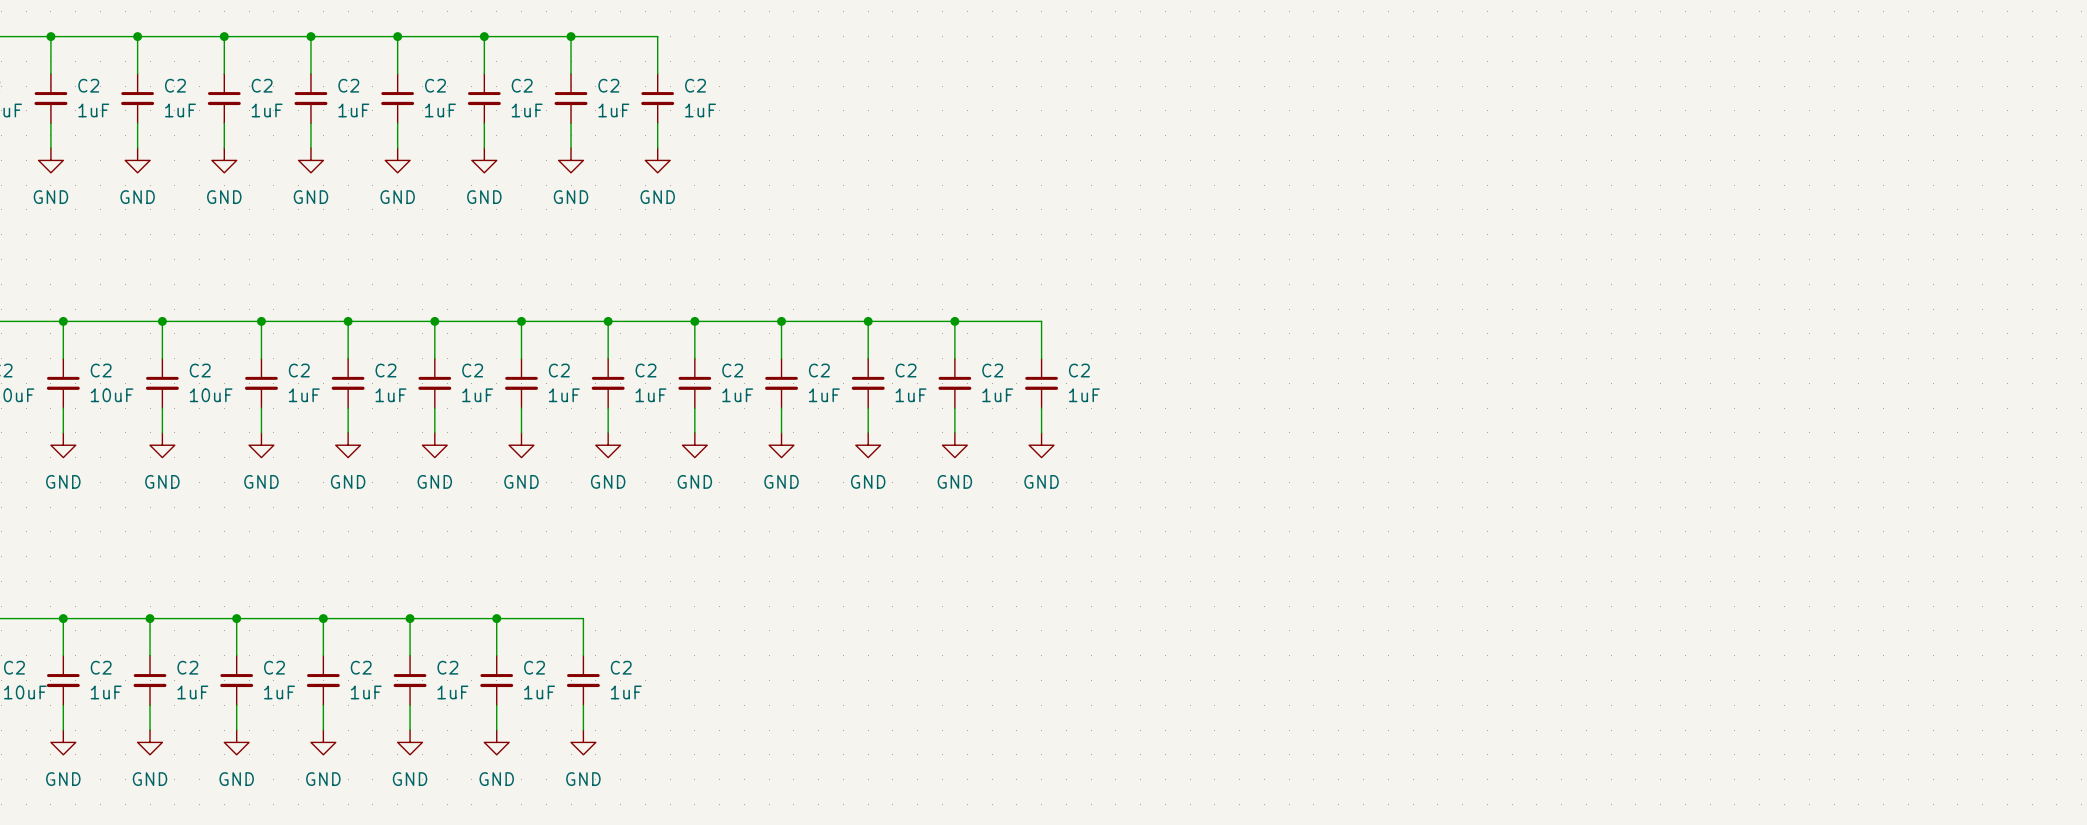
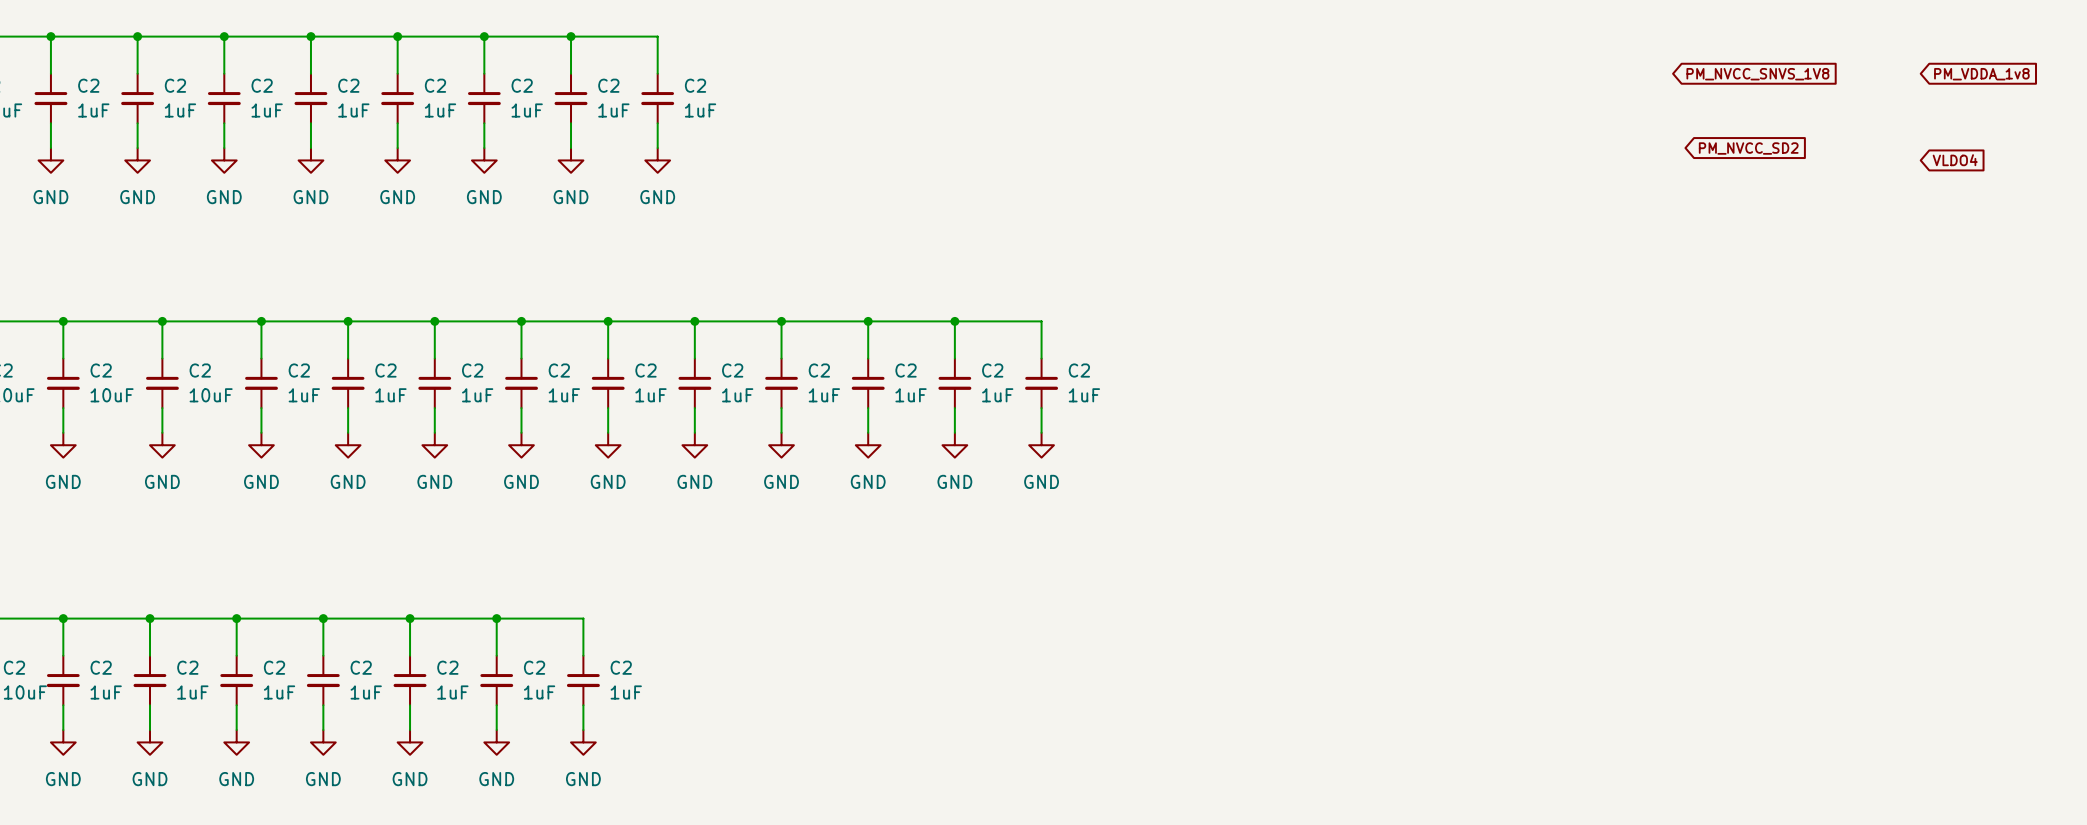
global label: none -> PM_NVCC_SNVS_1V8 (1757, 74)
global label: none -> PM_VDDA_1v8 (1981, 74)
global label: none -> PM_NVCC_SD2 (1748, 148)
global label: none -> VLDO4 (1955, 160)

